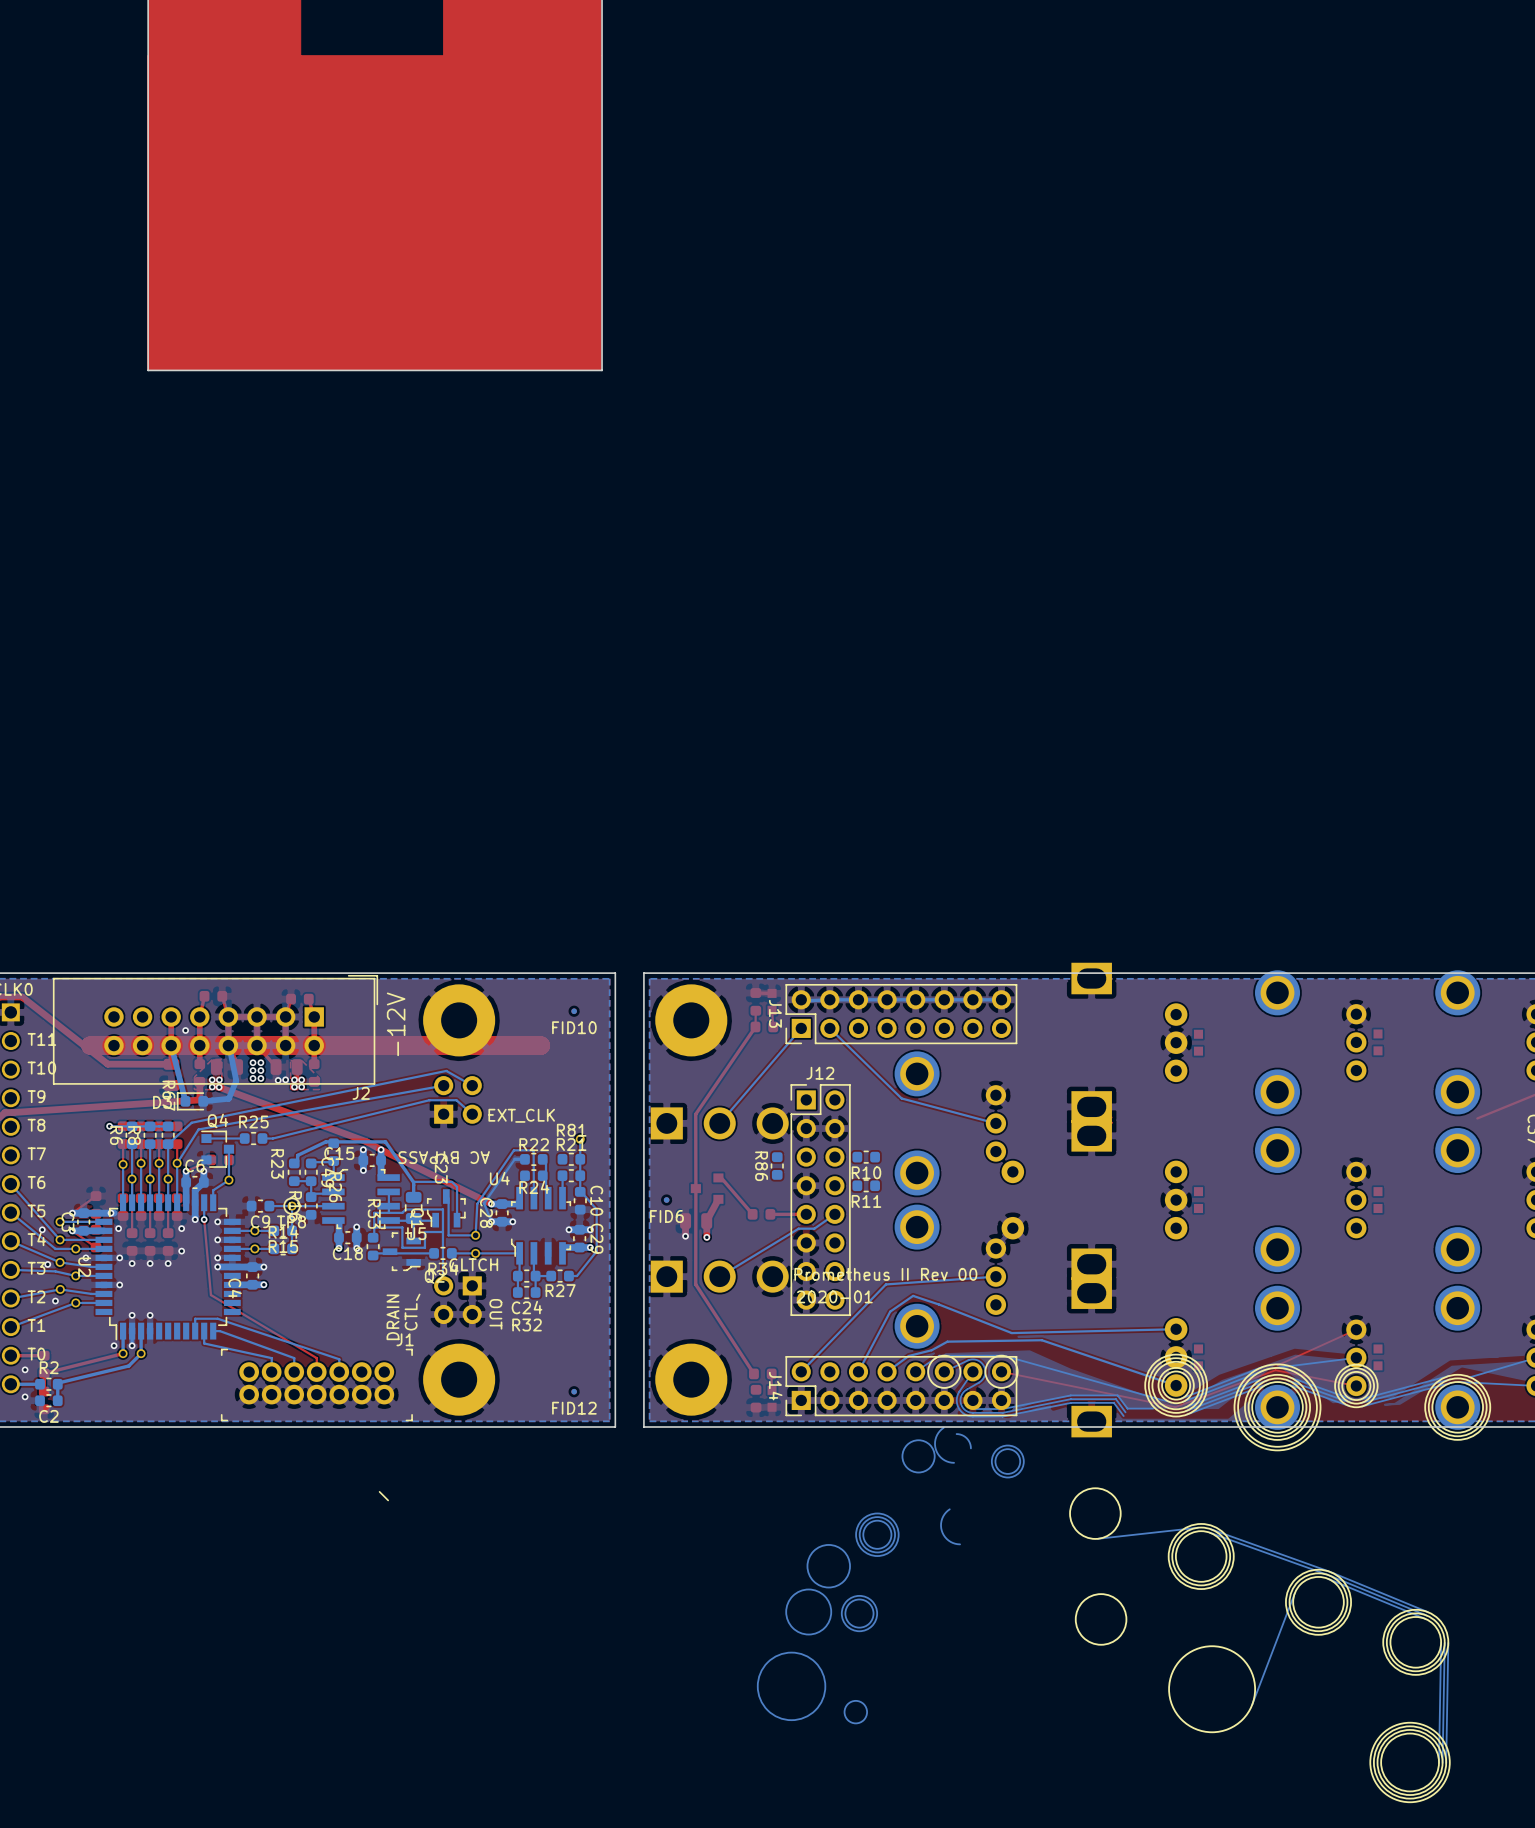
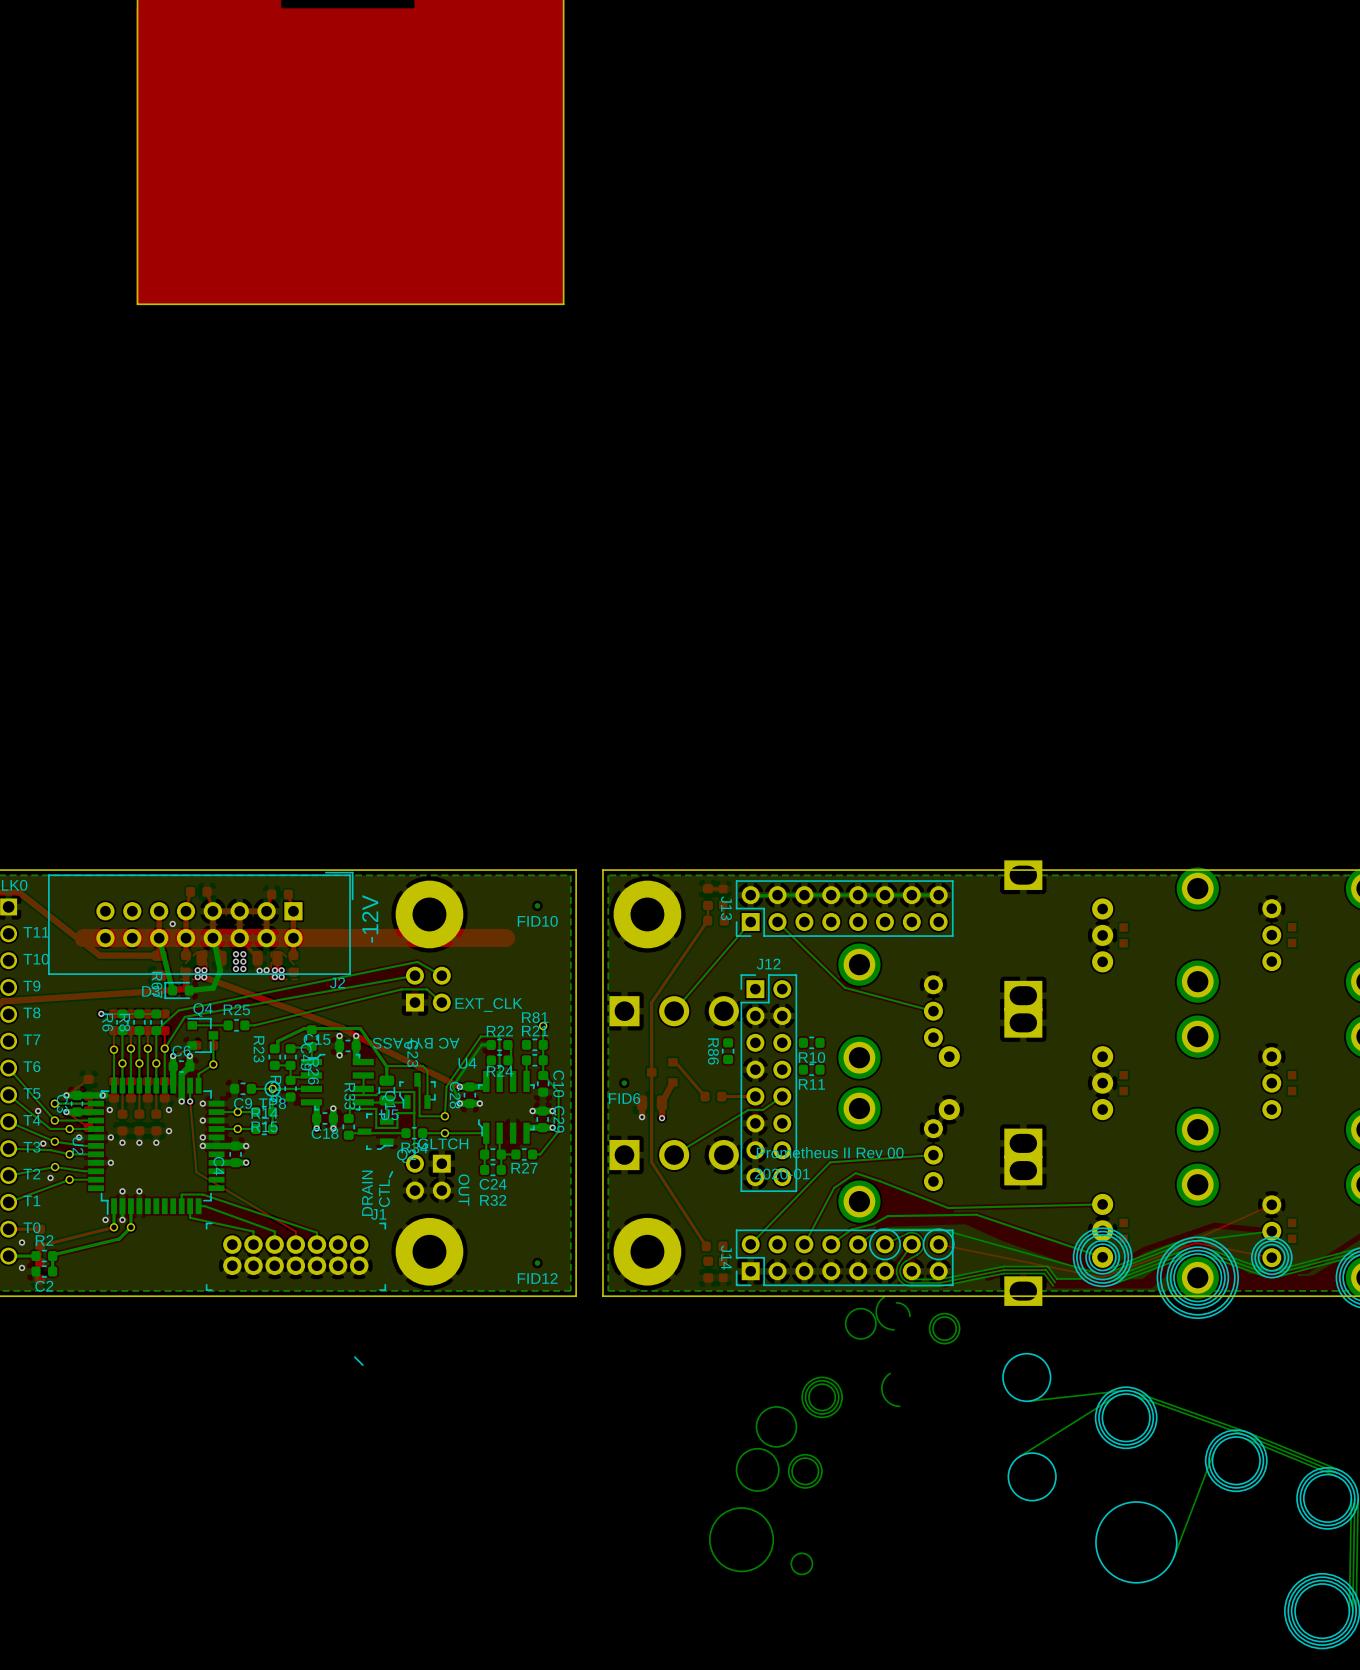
bottom track: none -> (1113, 1397) (1019, 1456)

